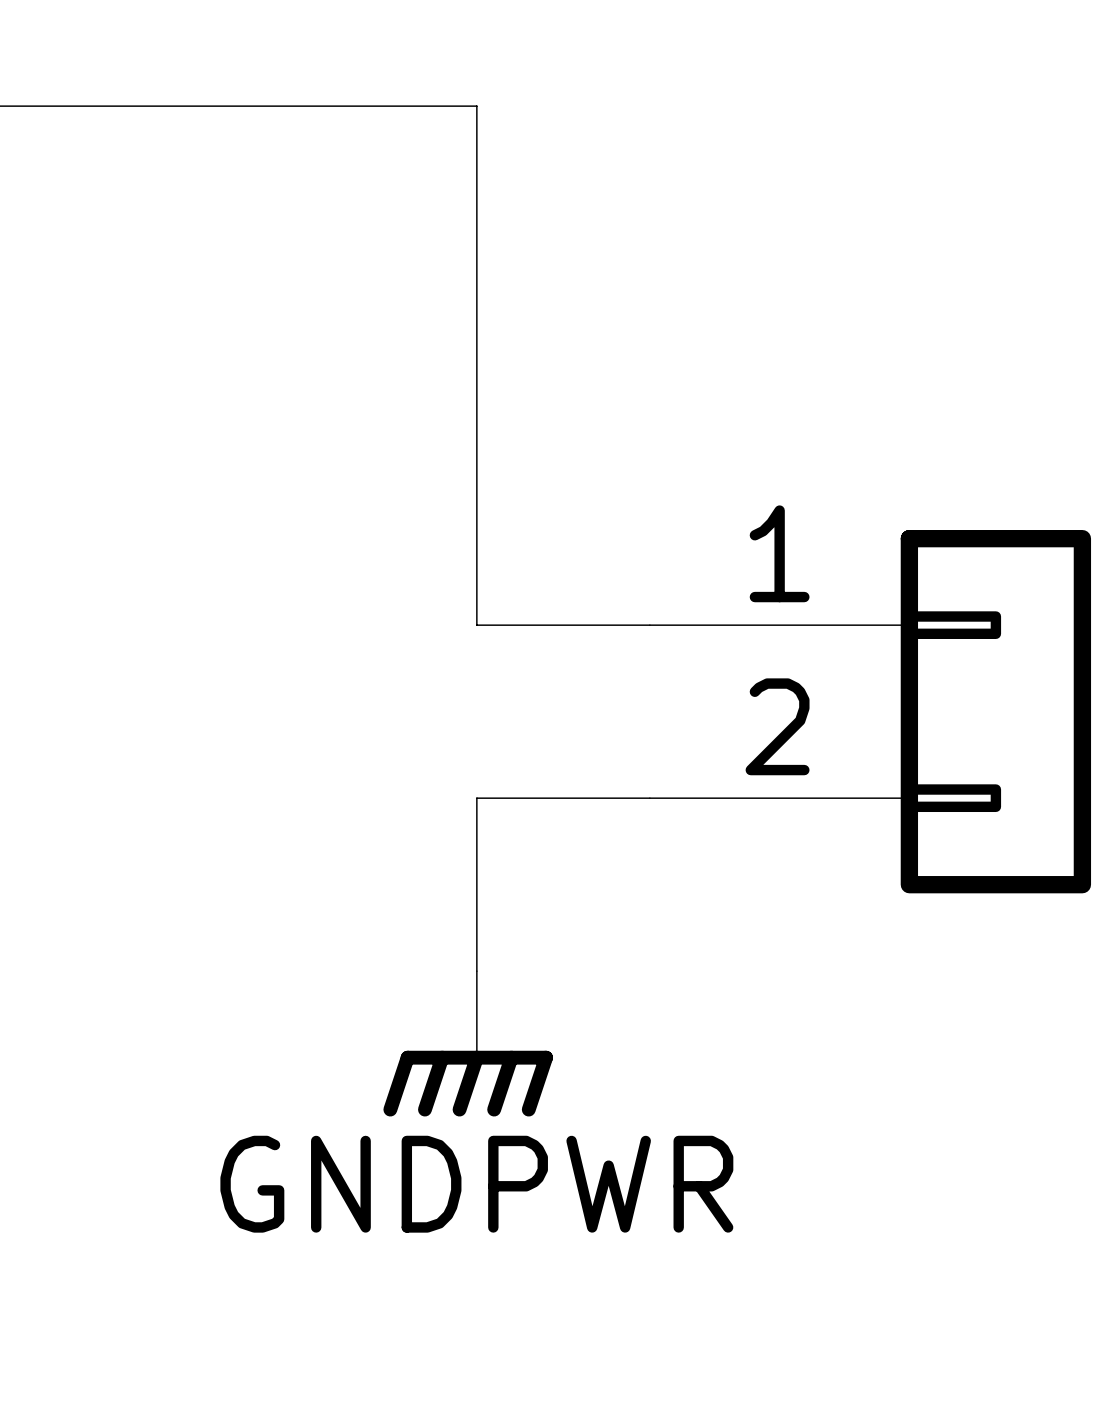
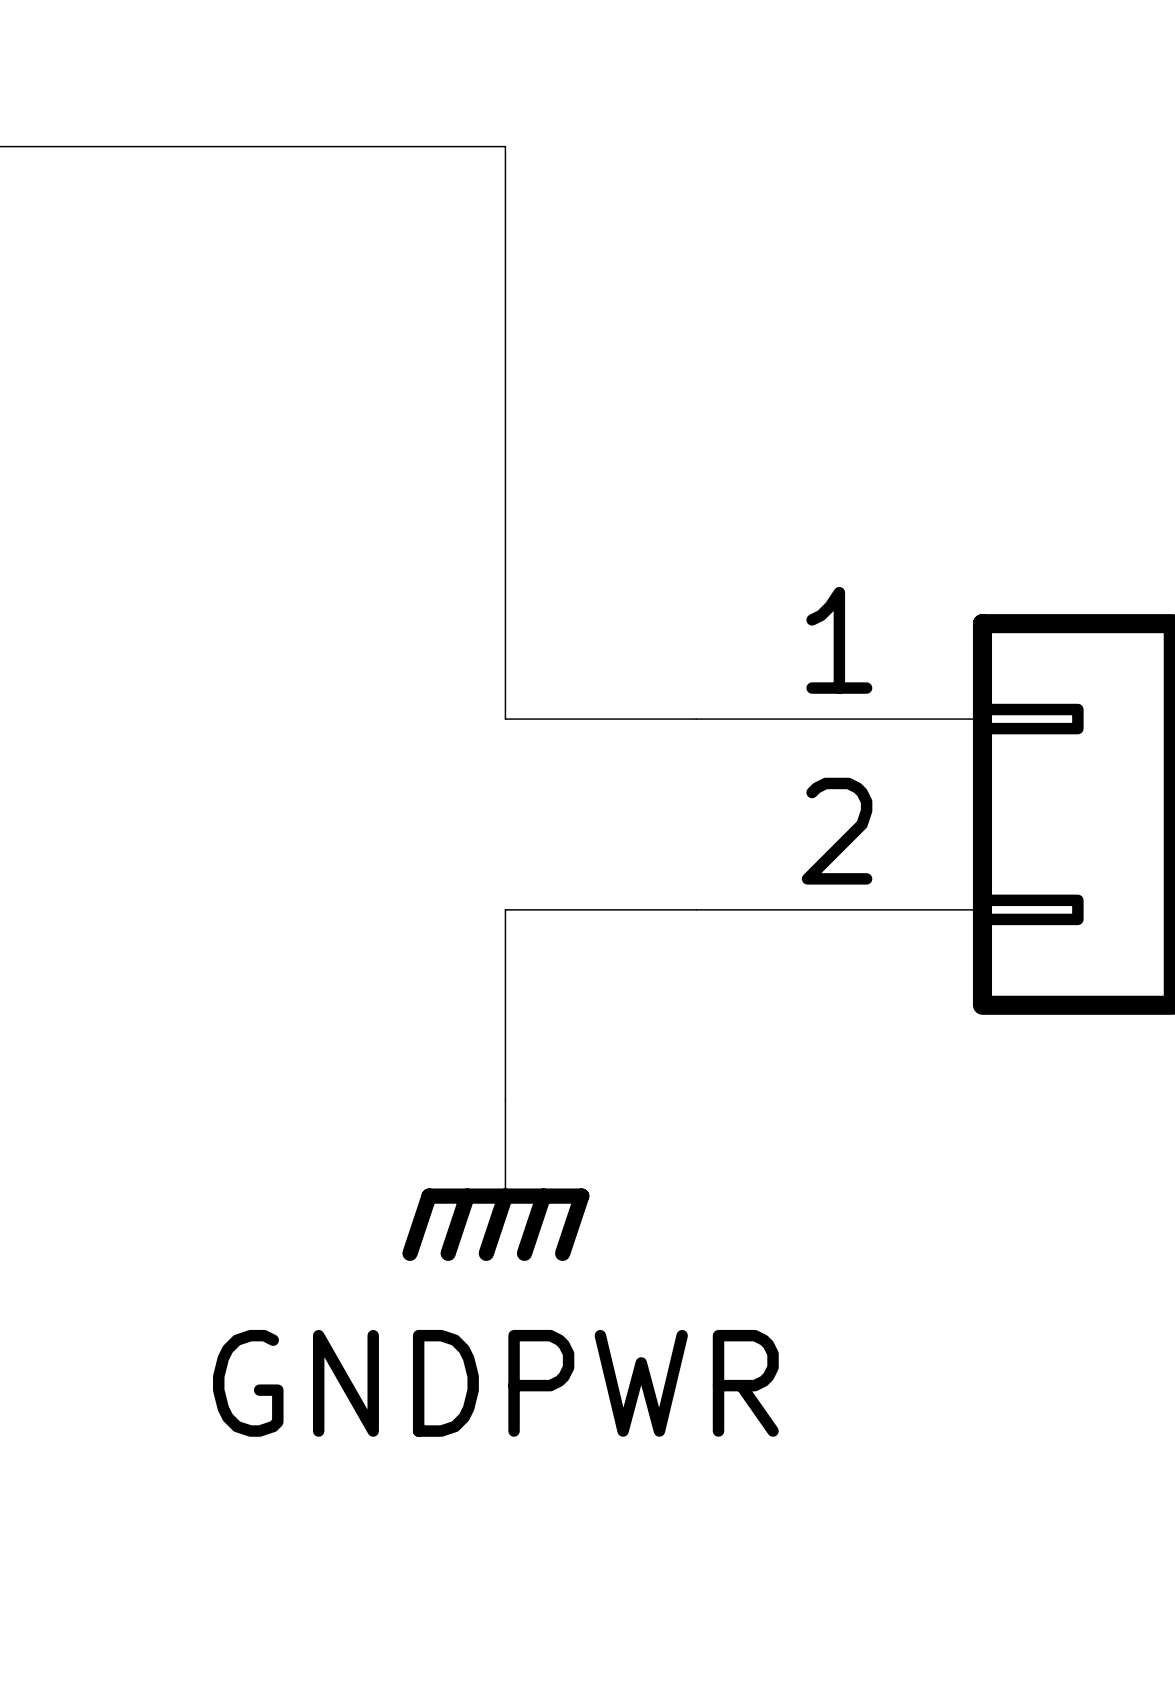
power symbol text position: GNDPWR (476, 1184) -> GNDPWR (495, 1383)

